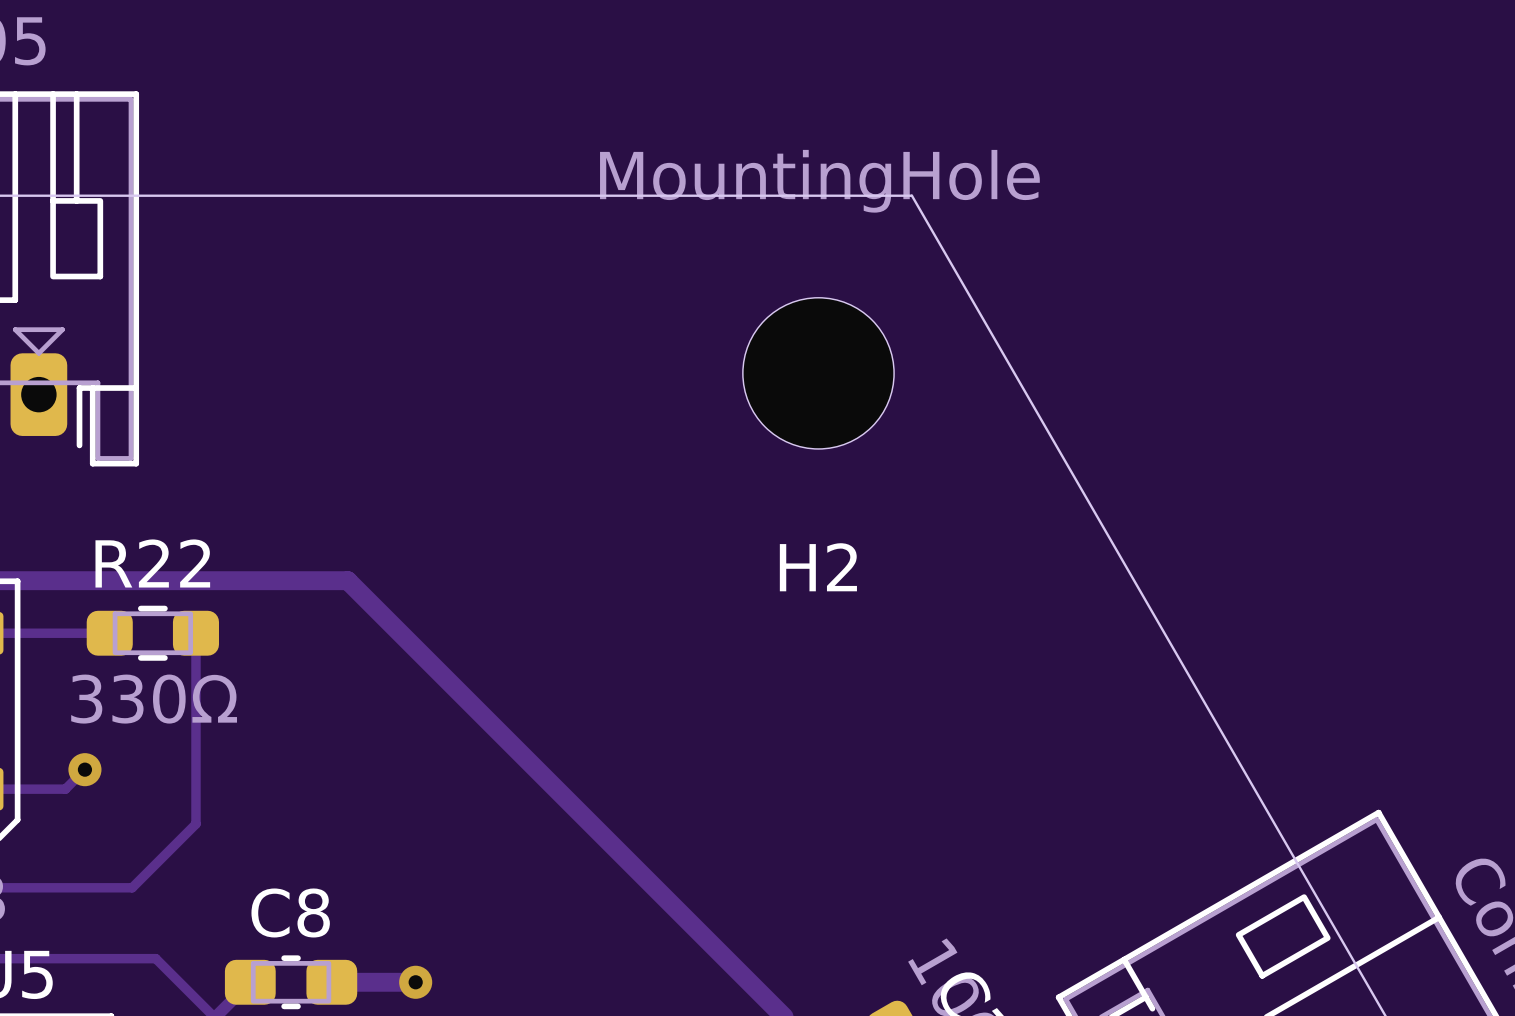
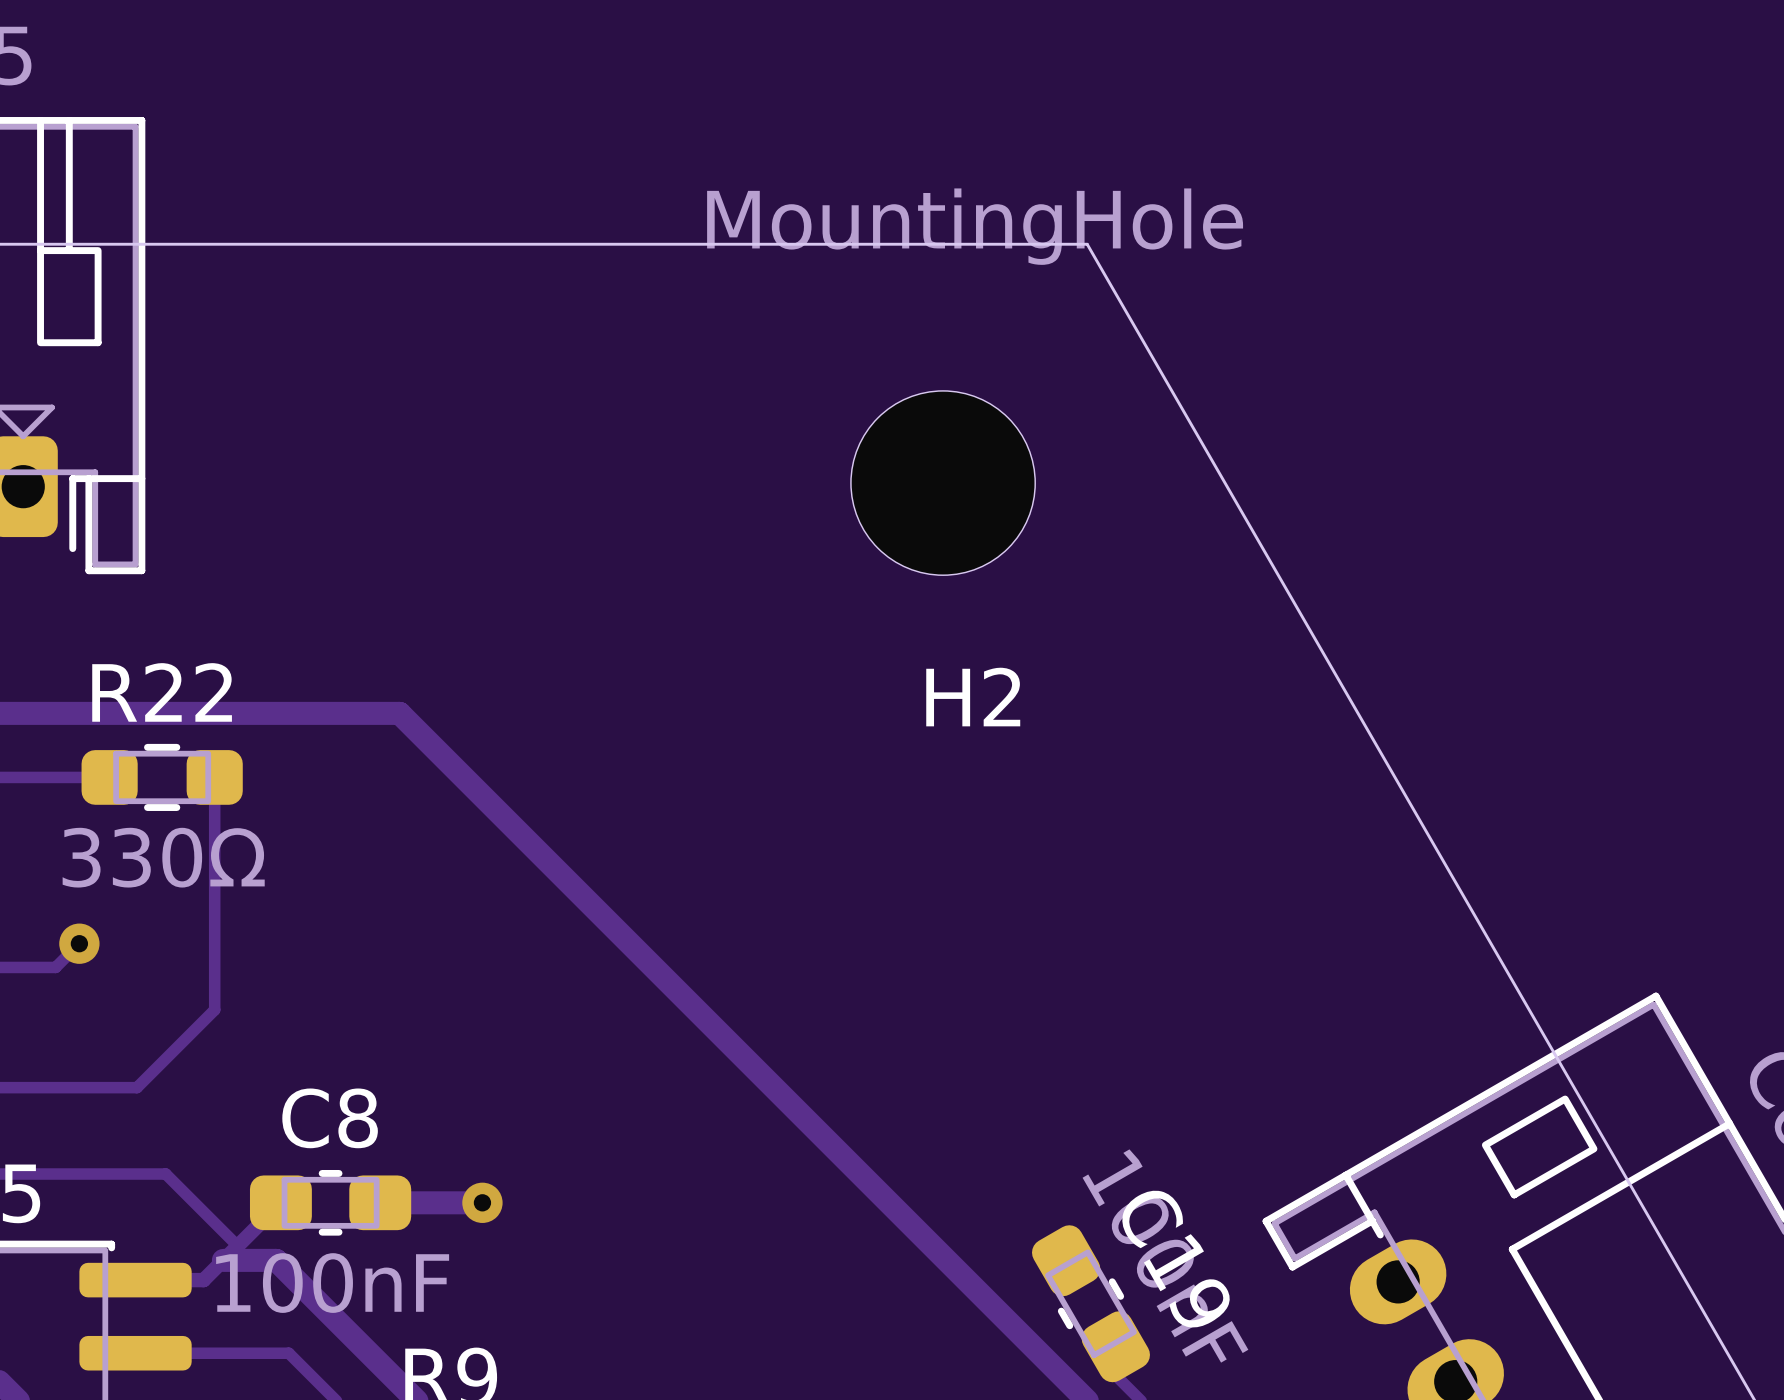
H2 position: (818, 373) -> (943, 483)

